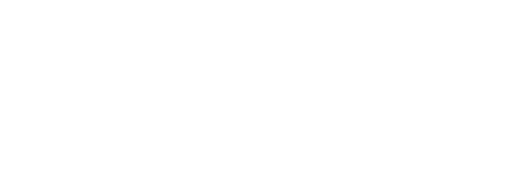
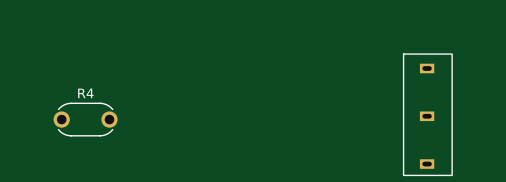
part: none -> (427, 114)
R4: none -> (85, 119)

